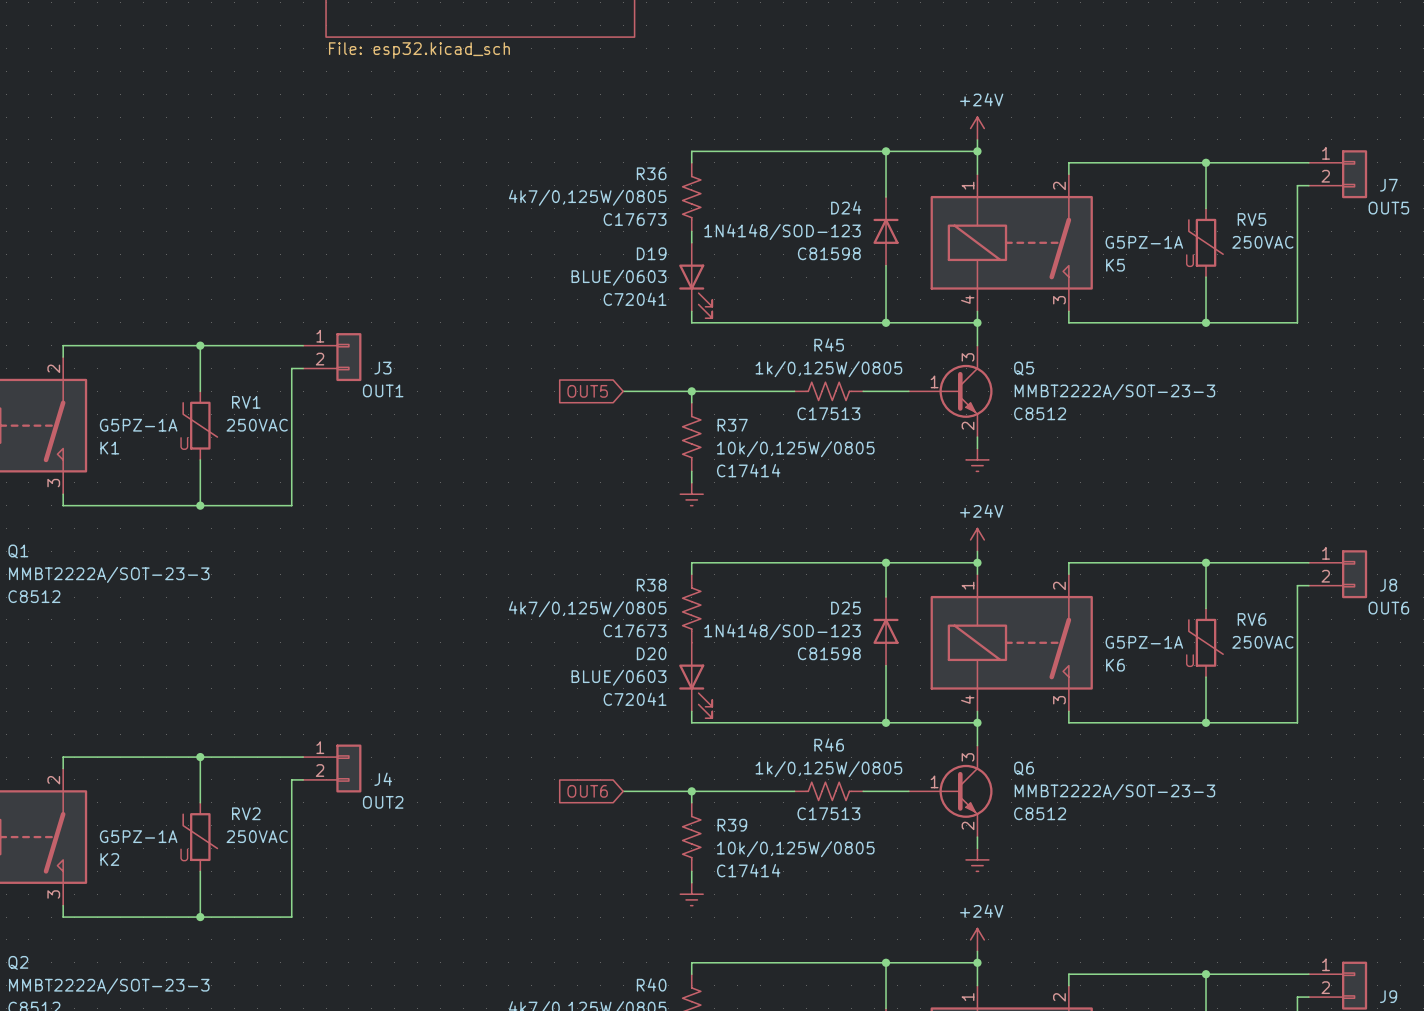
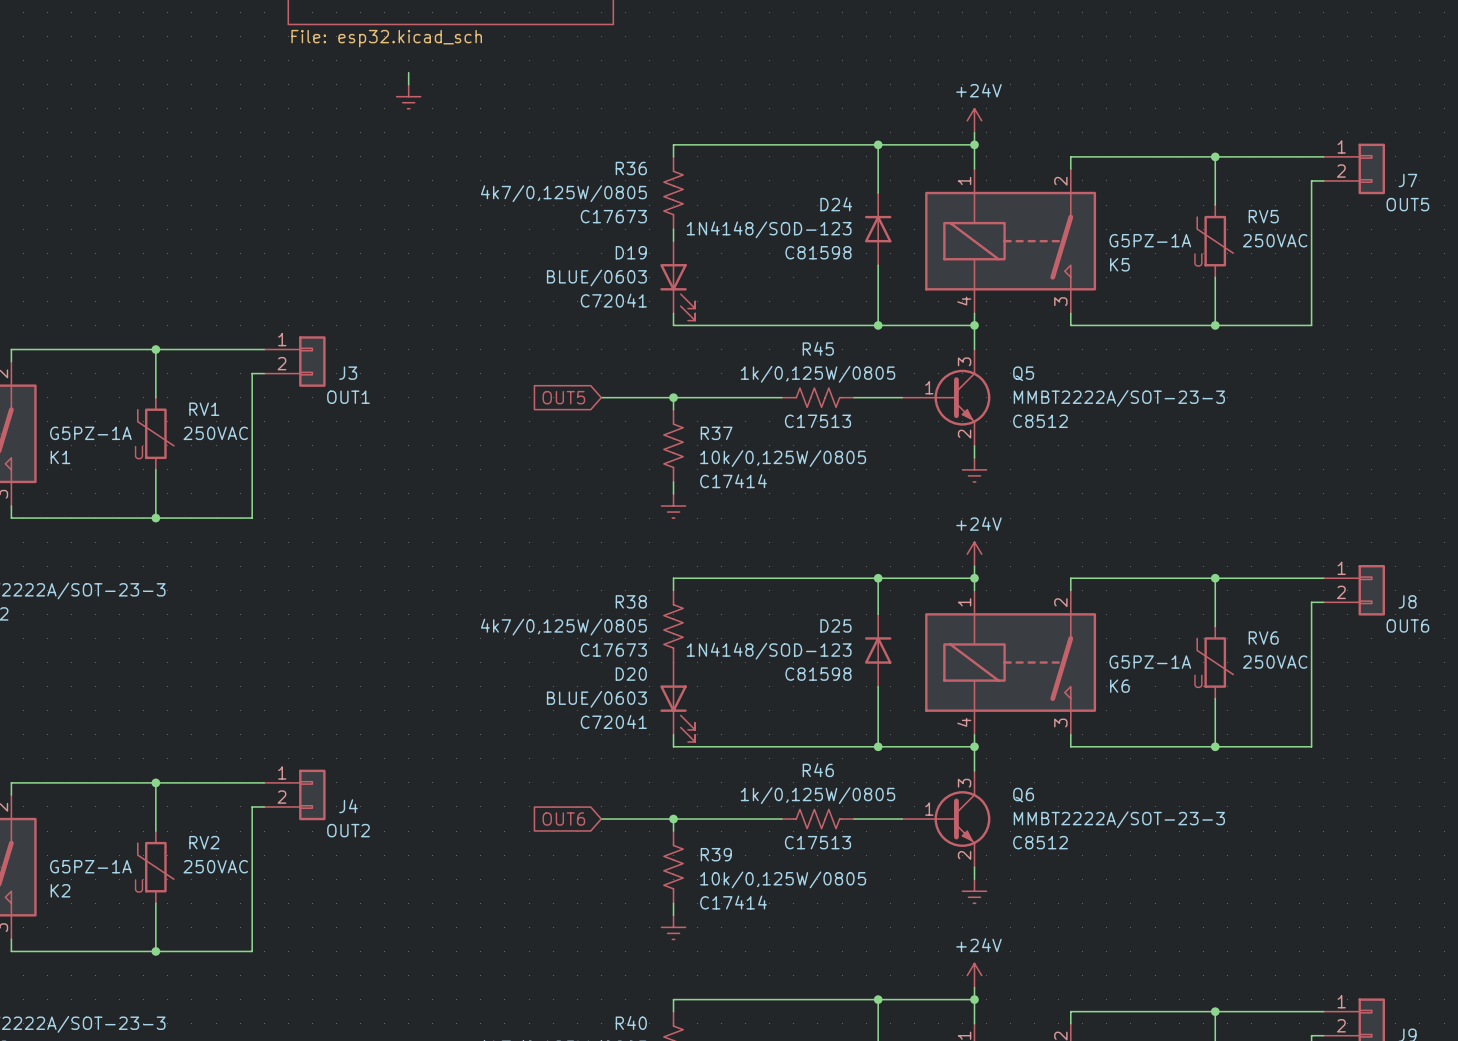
wire: none -> (408, 72) (408, 84)
power symbol: none -> (408, 96)

